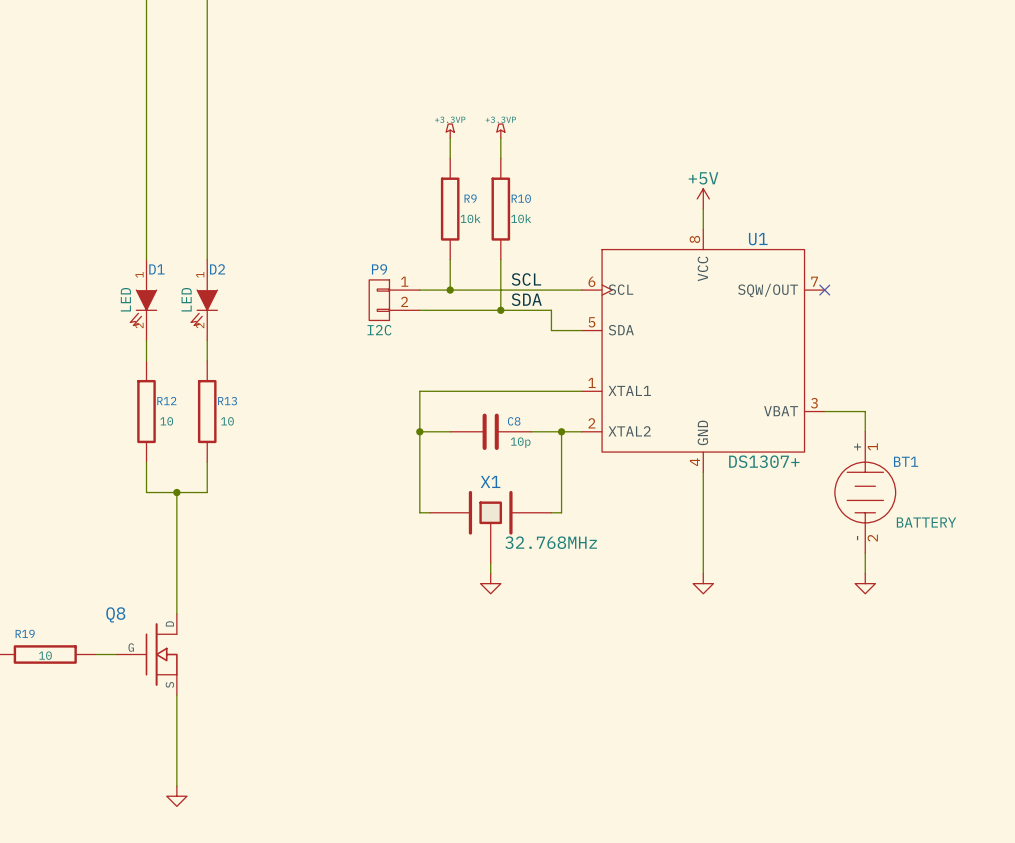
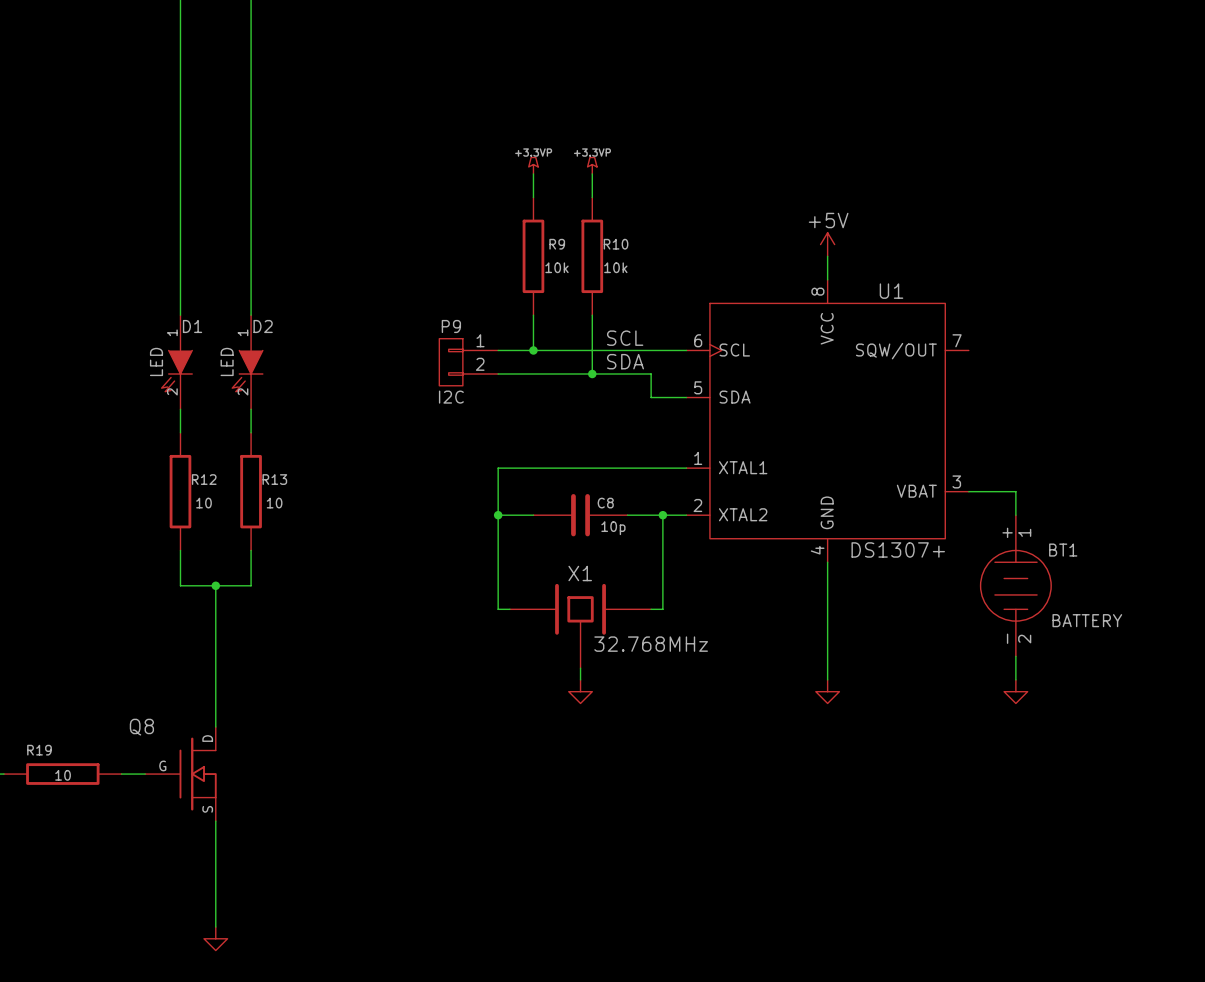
no-connect mark: (824, 290) -> none

